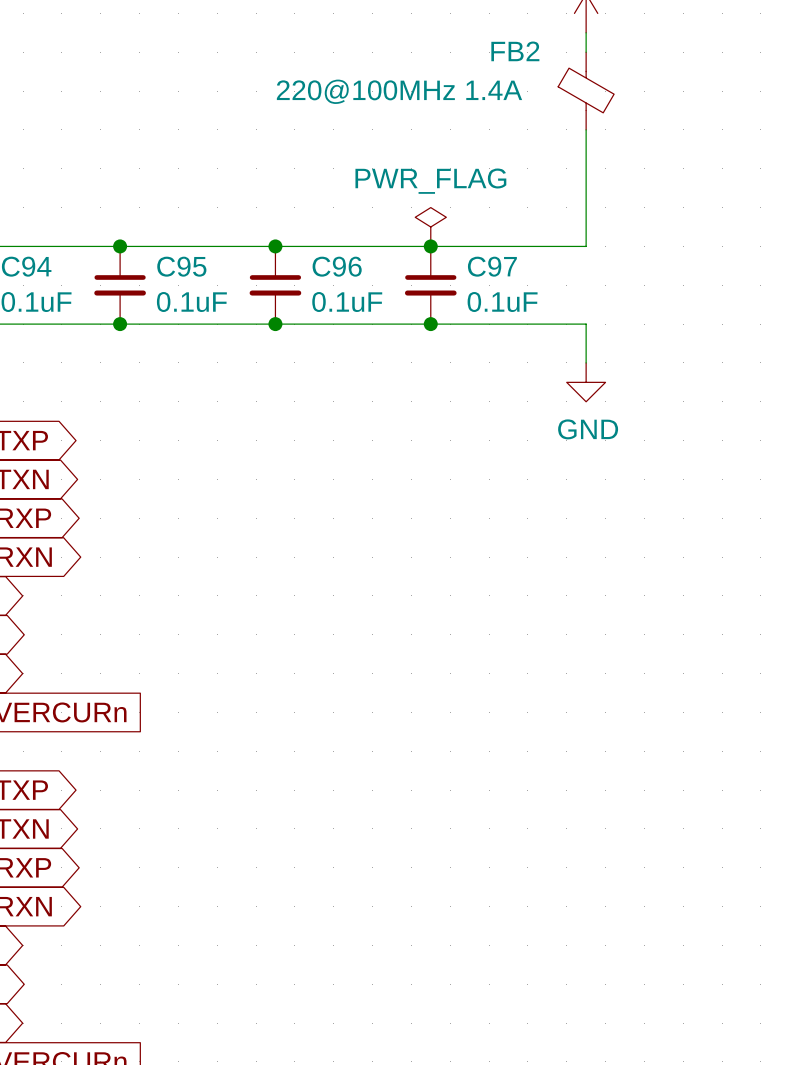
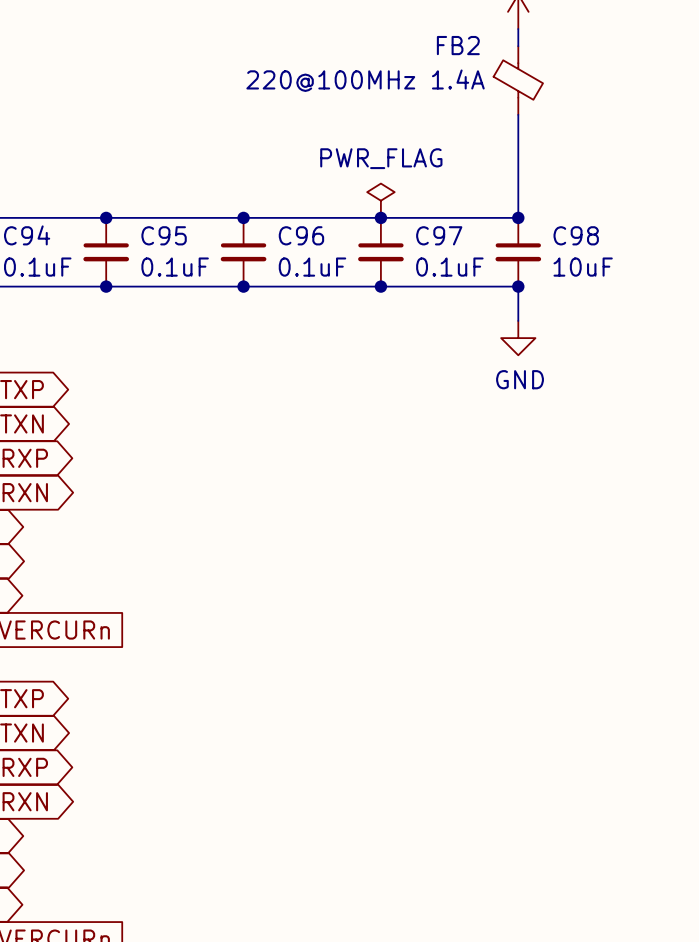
junction: none -> (518, 217)
C98: none -> 10uF (518, 252)
junction: none -> (518, 286)

